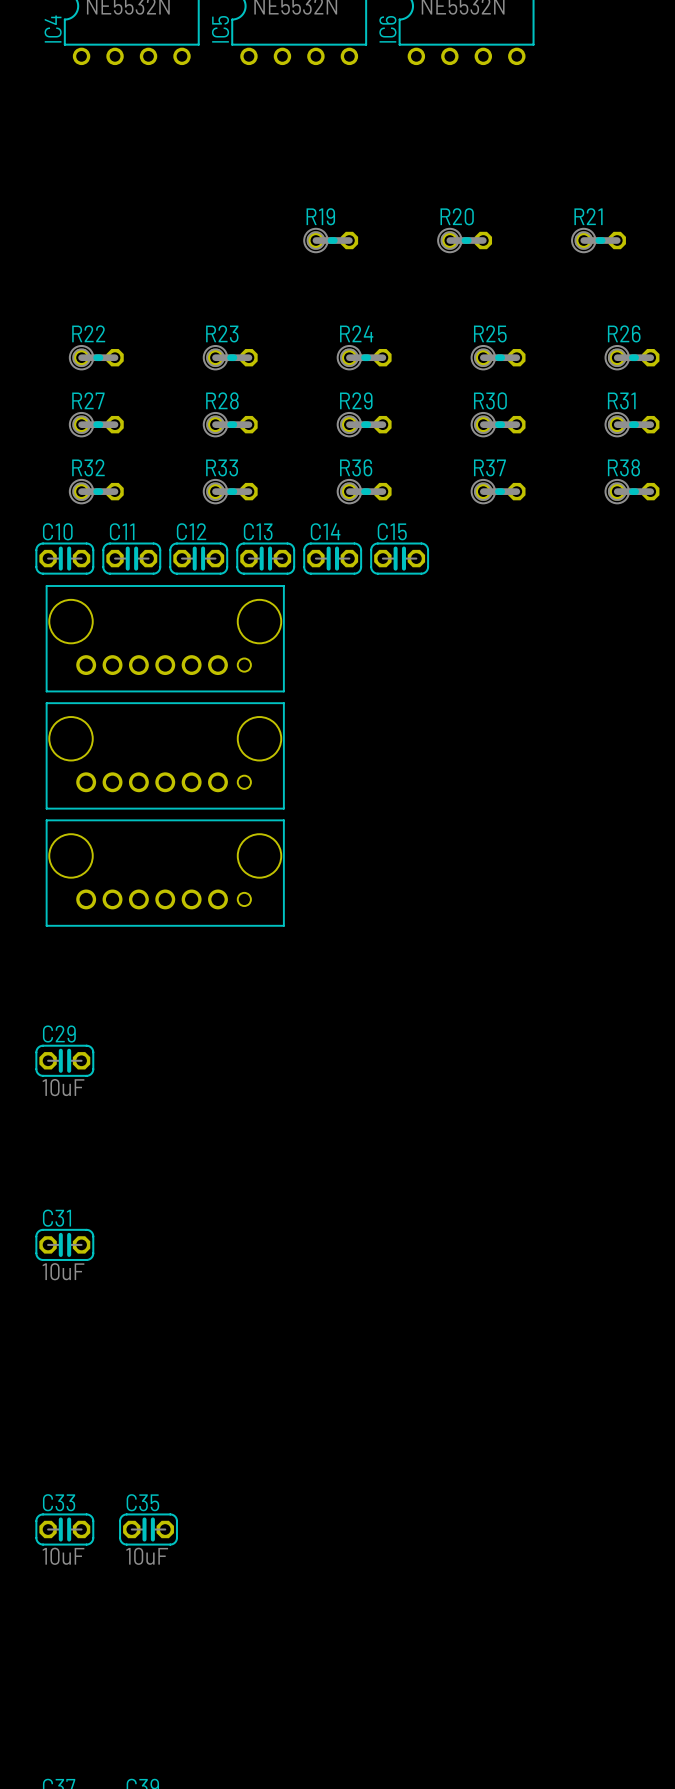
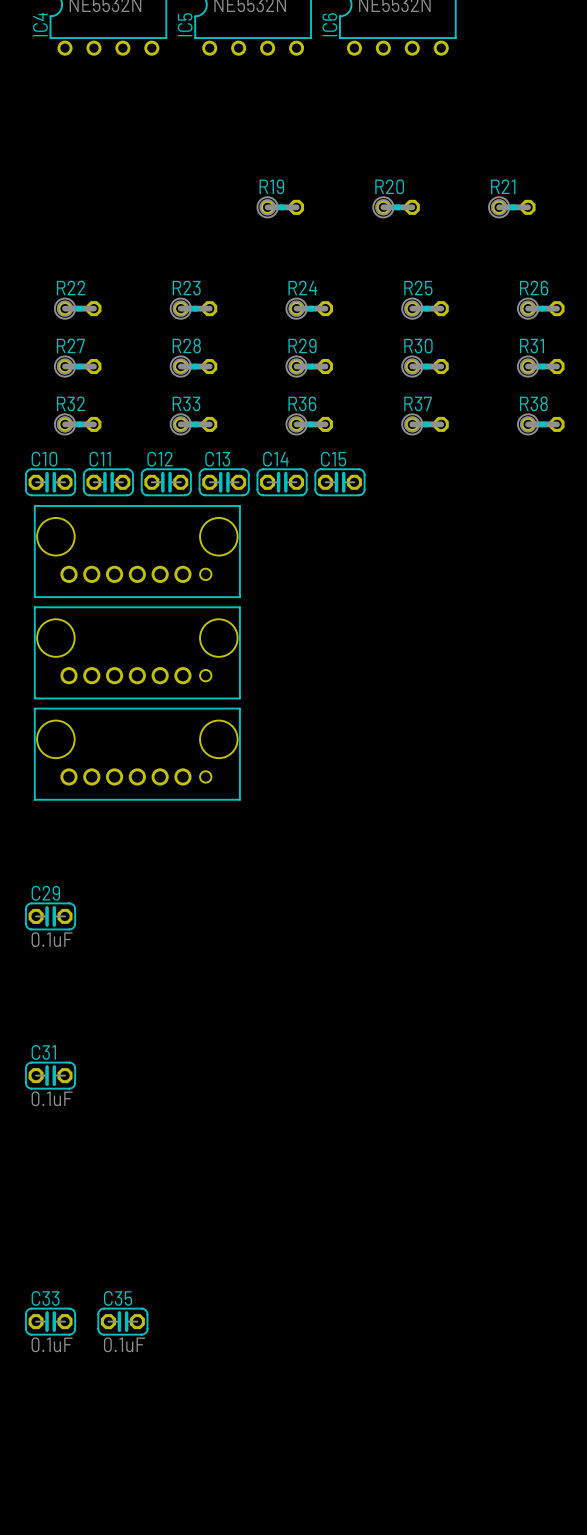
C29 value: 10uF (63, 1087) -> 0.1uF (52, 939)
C31 value: 10uF (63, 1271) -> 0.1uF (52, 1098)
C33 value: 10uF (63, 1556) -> 0.1uF (52, 1344)
C35 value: 10uF (147, 1556) -> 0.1uF (124, 1344)

